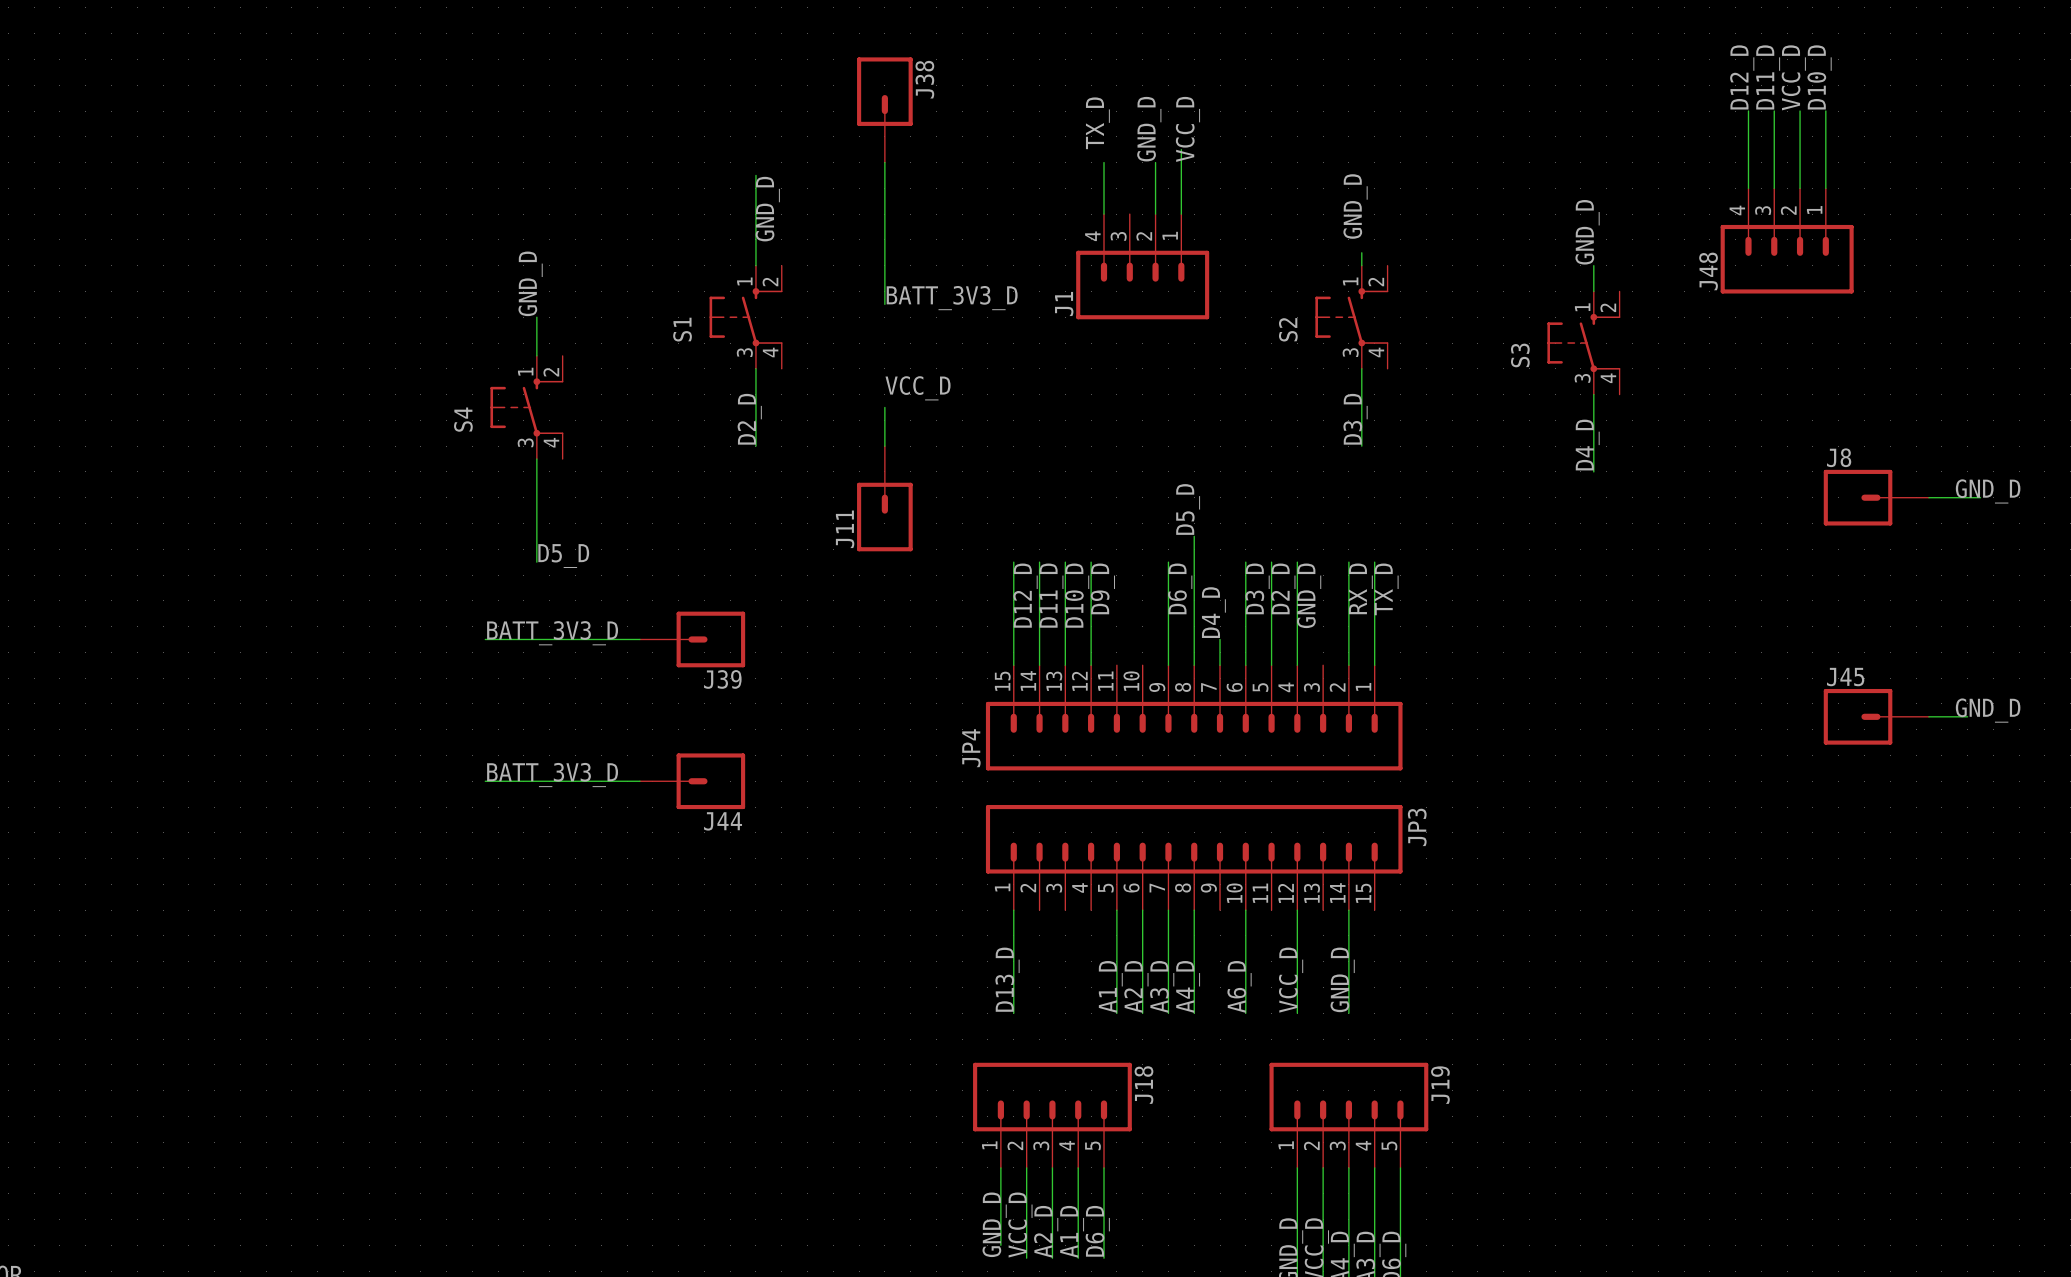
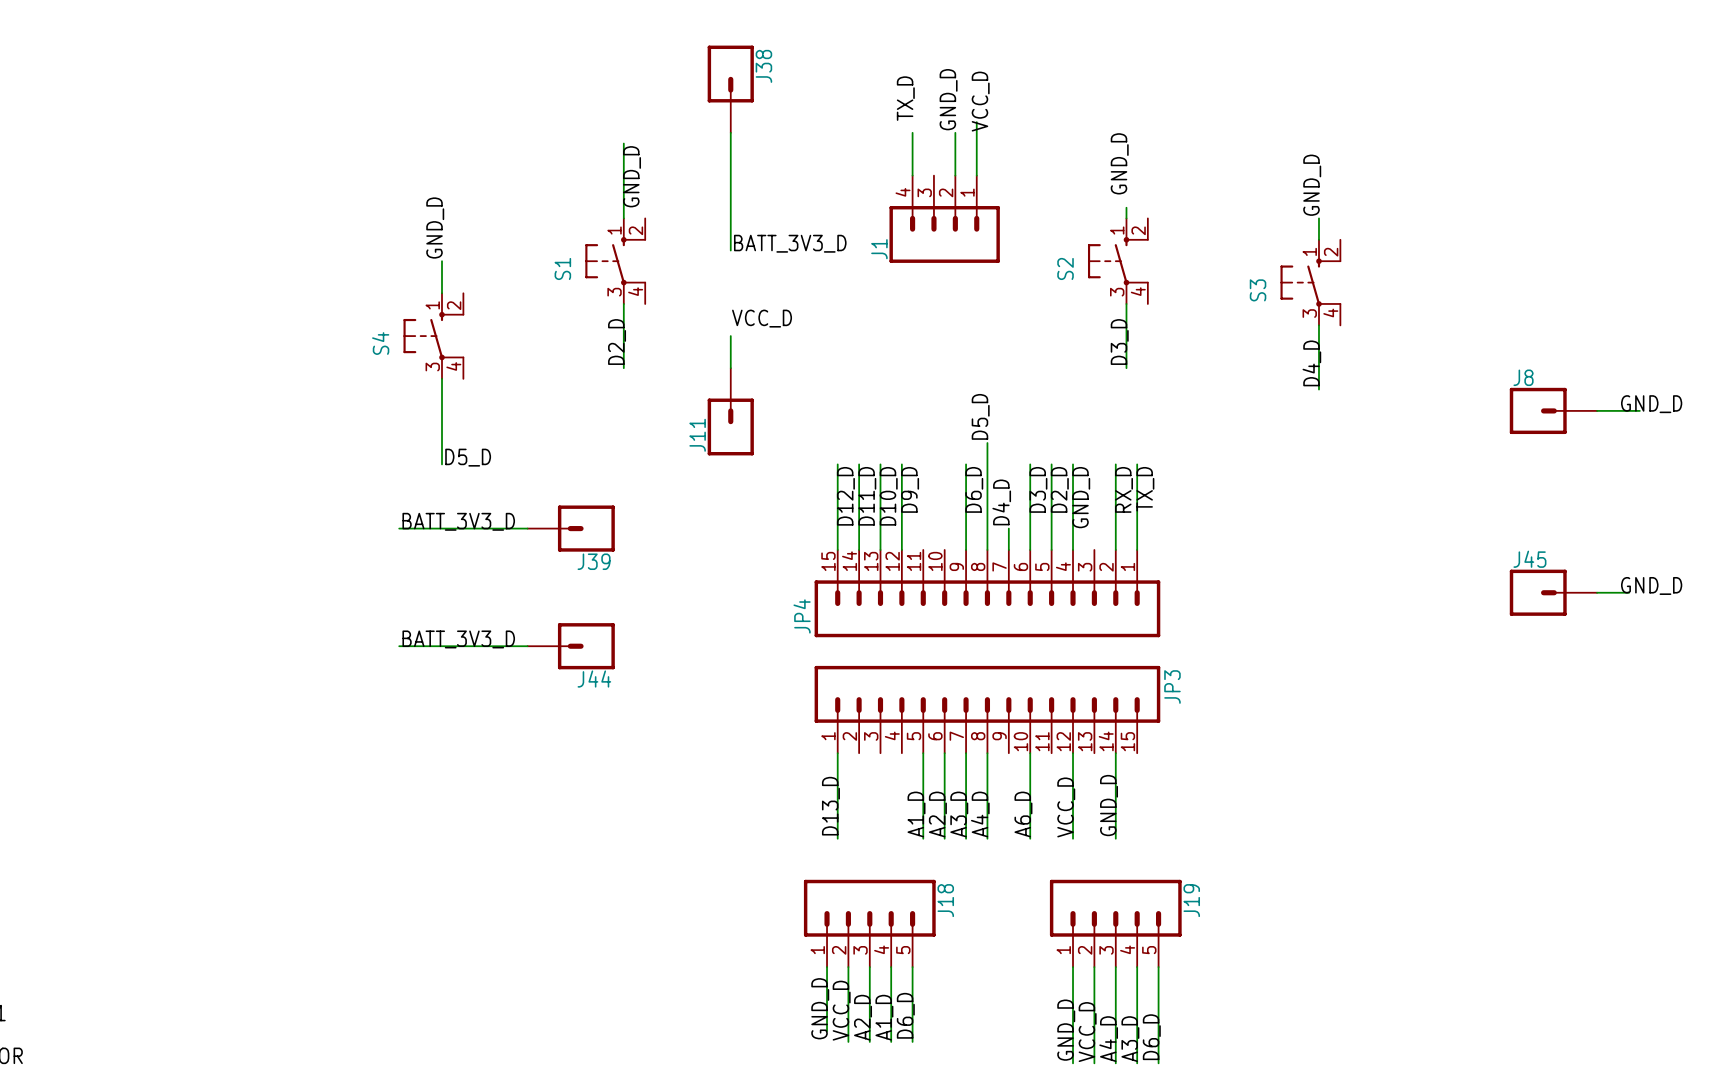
label: D12_D (1742, 77) -> none
label: D11_D (1768, 77) -> none
label: VCC_D (1793, 77) -> none
label: D10_D (1819, 77) -> none
wire: (1748, 111) (1748, 188) -> none
wire: (1774, 111) (1774, 188) -> none
wire: (1800, 111) (1800, 188) -> none
wire: (1825, 111) (1825, 188) -> none
J48: (1787, 240) -> none

